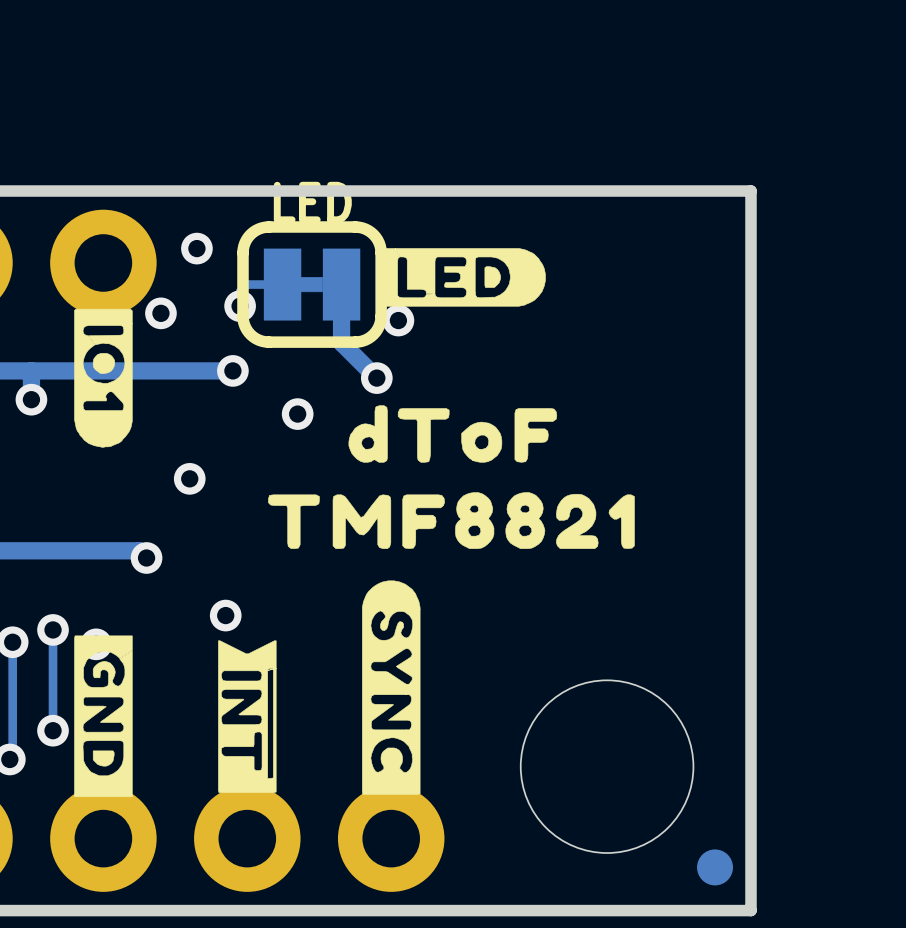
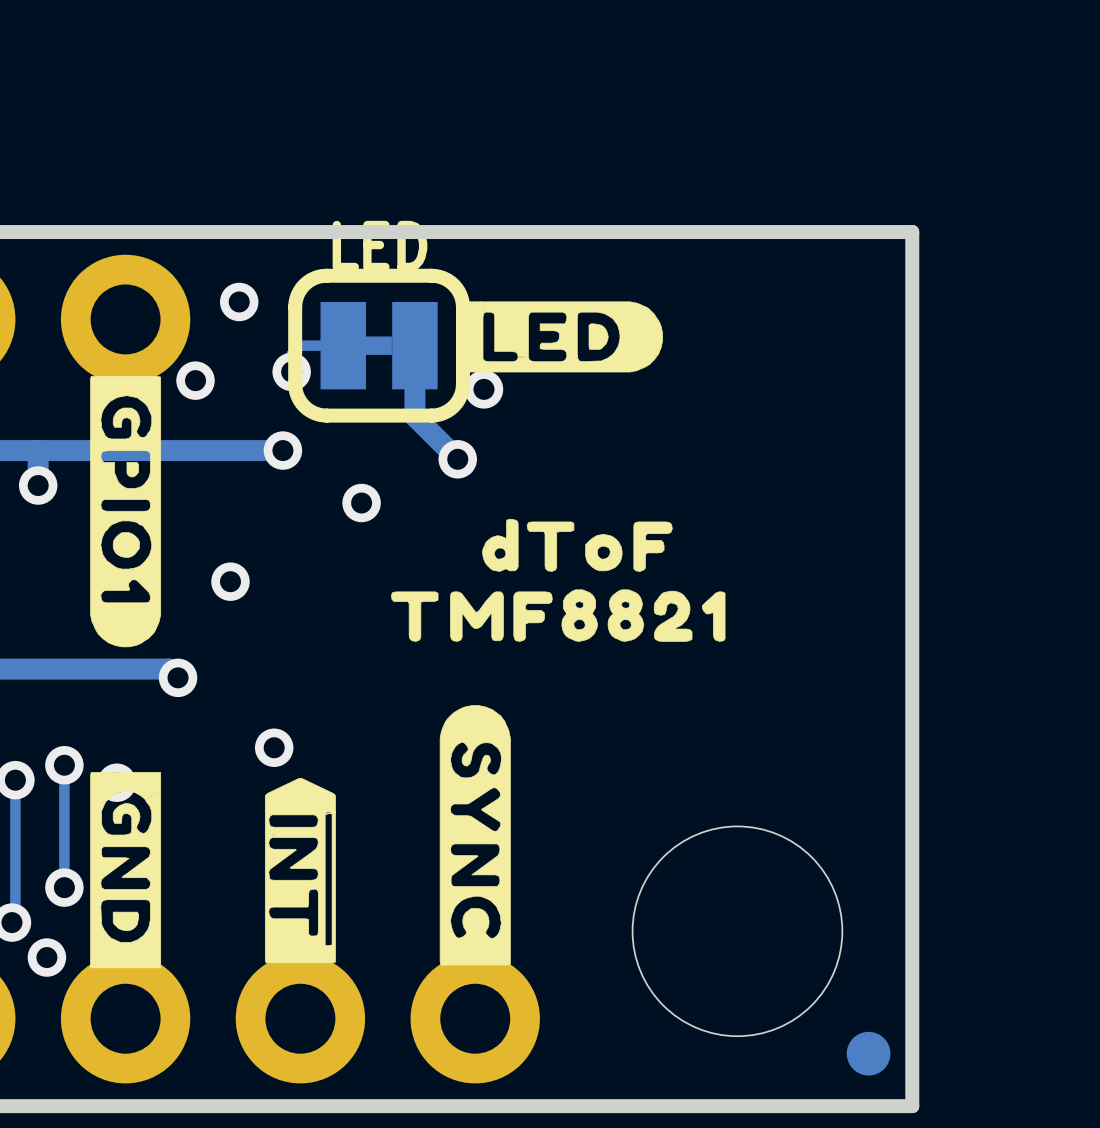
drawing shape: [74, 308, 133, 448] -> [90, 376, 162, 648]
drawing shape: [348, 405, 558, 463] -> [482, 518, 673, 572]
drawing shape: [268, 492, 635, 549] -> [390, 589, 726, 642]
drawing shape: [218, 640, 277, 793] -> [264, 778, 336, 964]
via: none -> (46, 957)

